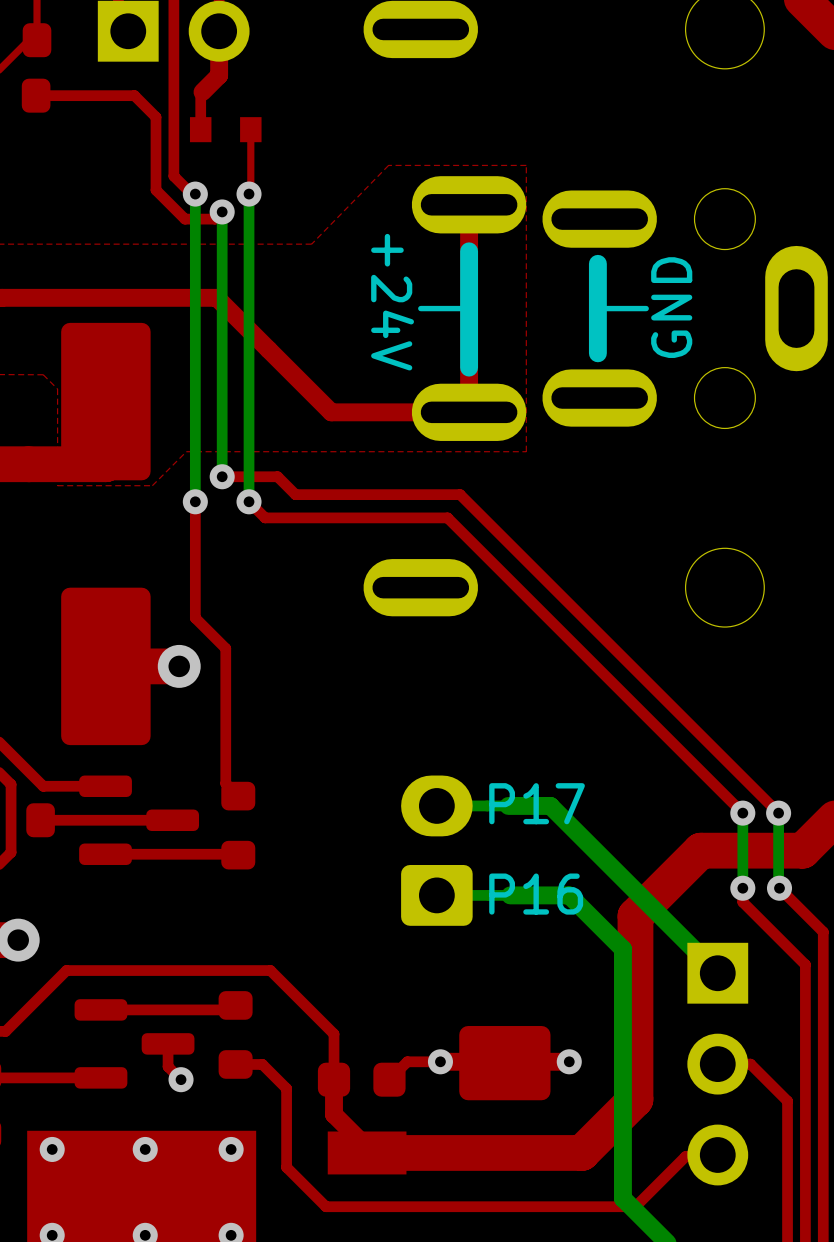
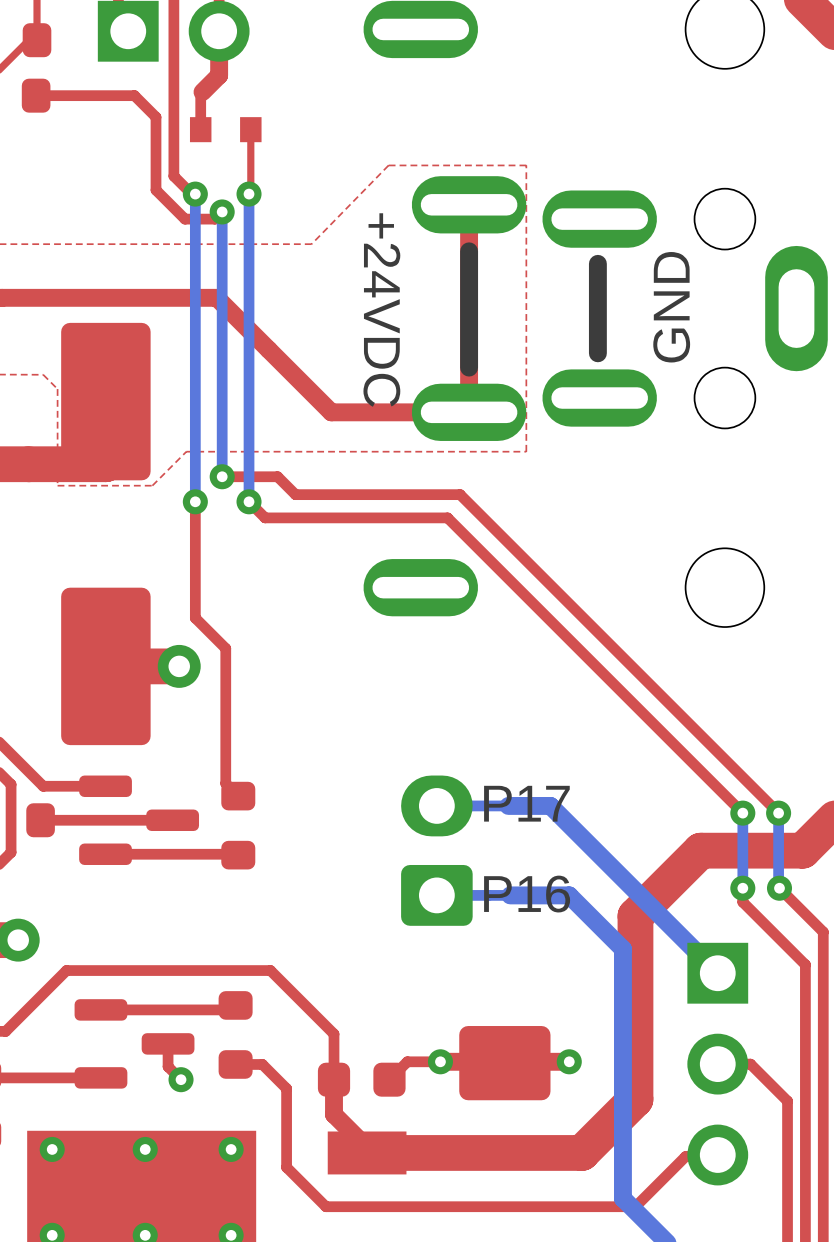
text: +24V (392, 302) -> +24VDC (381, 310)
line: (469, 308) (420, 308) -> none
line: (646, 308) (597, 308) -> none

